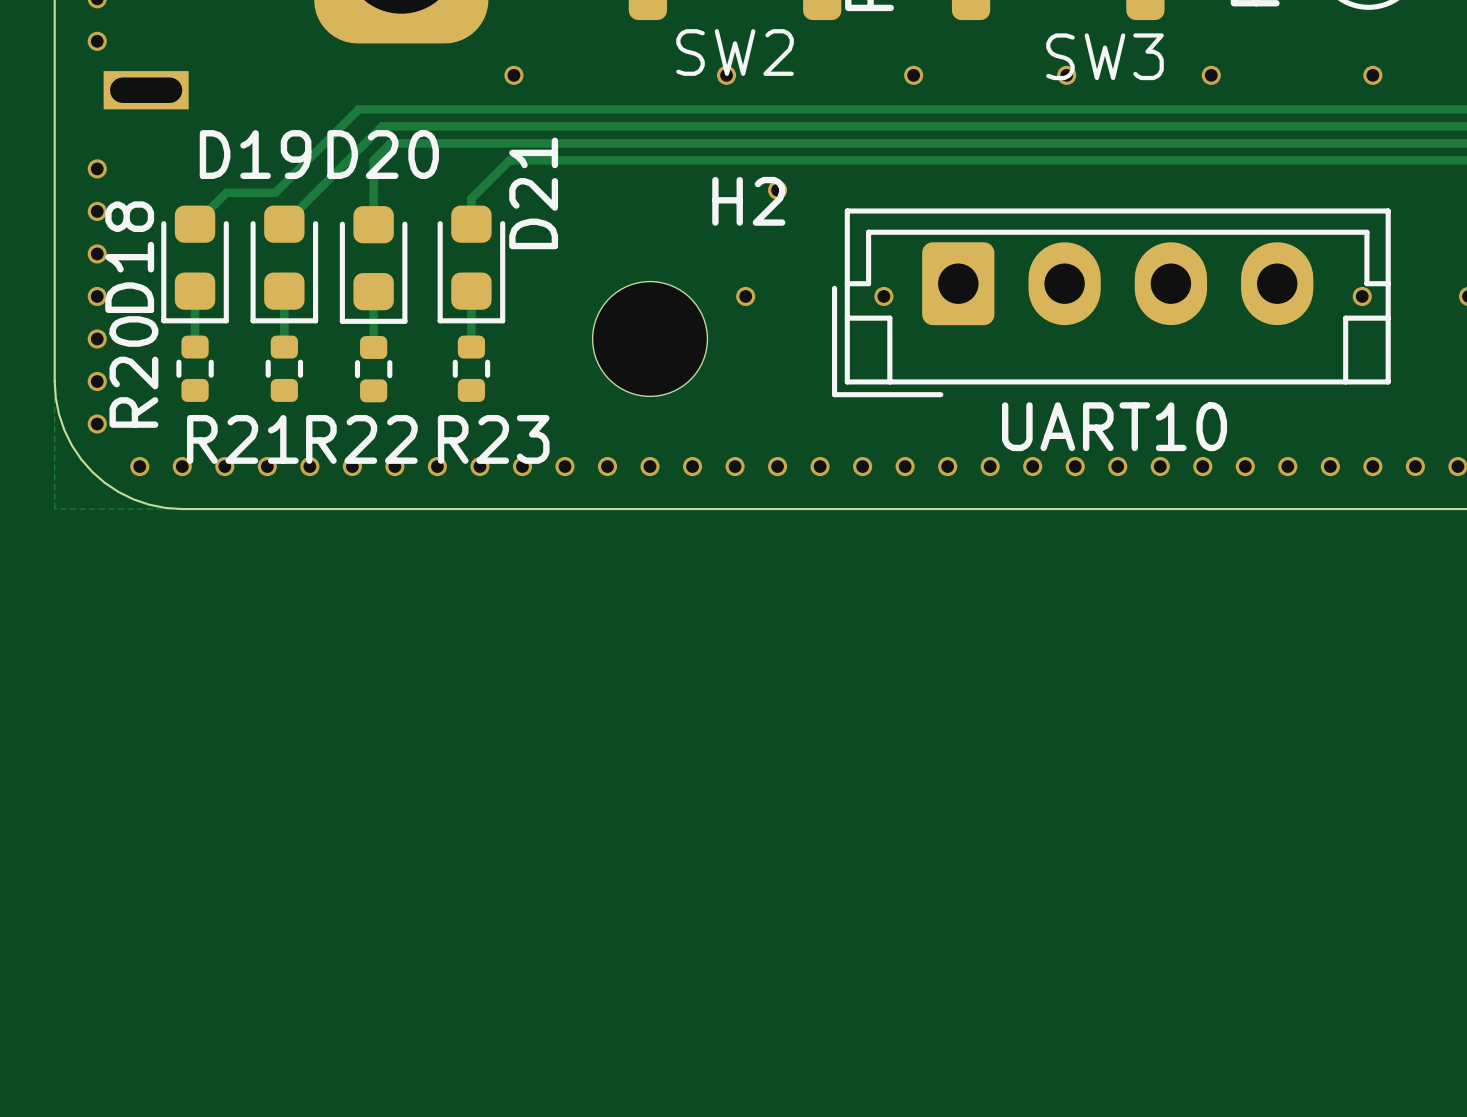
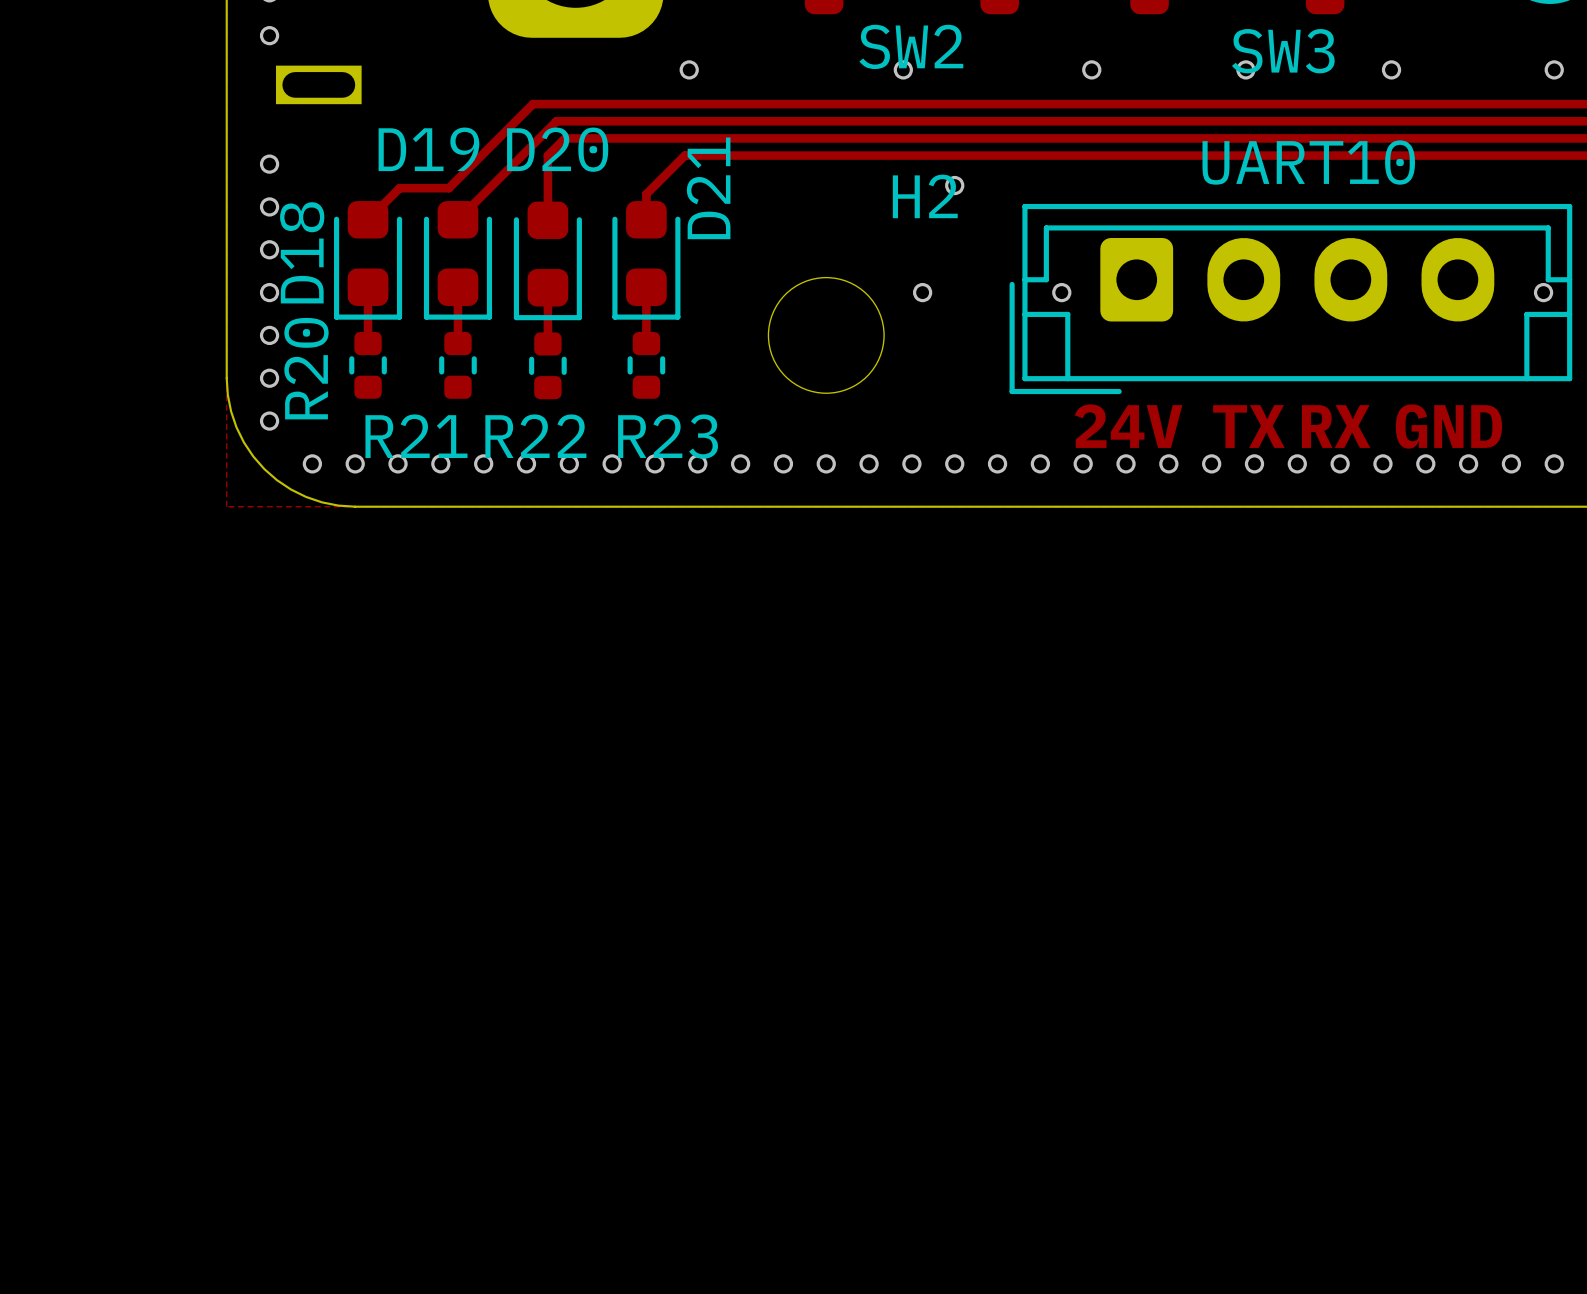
UART10 name position: UART10 (1114, 426) -> UART10 (1308, 162)
text: none -> 24V (1128, 426)
text: none -> TX (1248, 426)
text: none -> RX (1336, 426)
text: none -> GND (1448, 426)

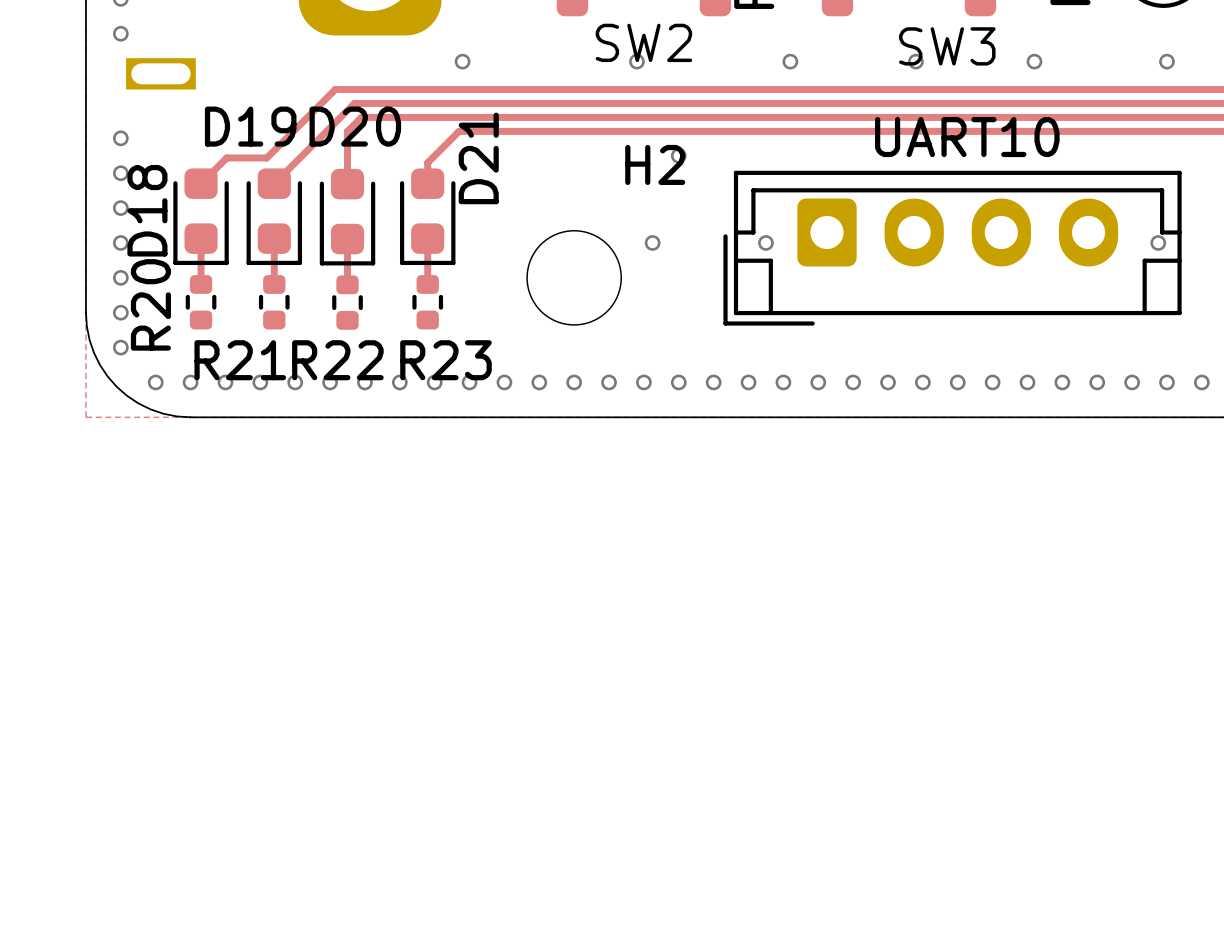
text: 24V (1128, 426) -> none
text: TX (1248, 426) -> none
text: RX (1336, 426) -> none
text: GND (1448, 426) -> none

